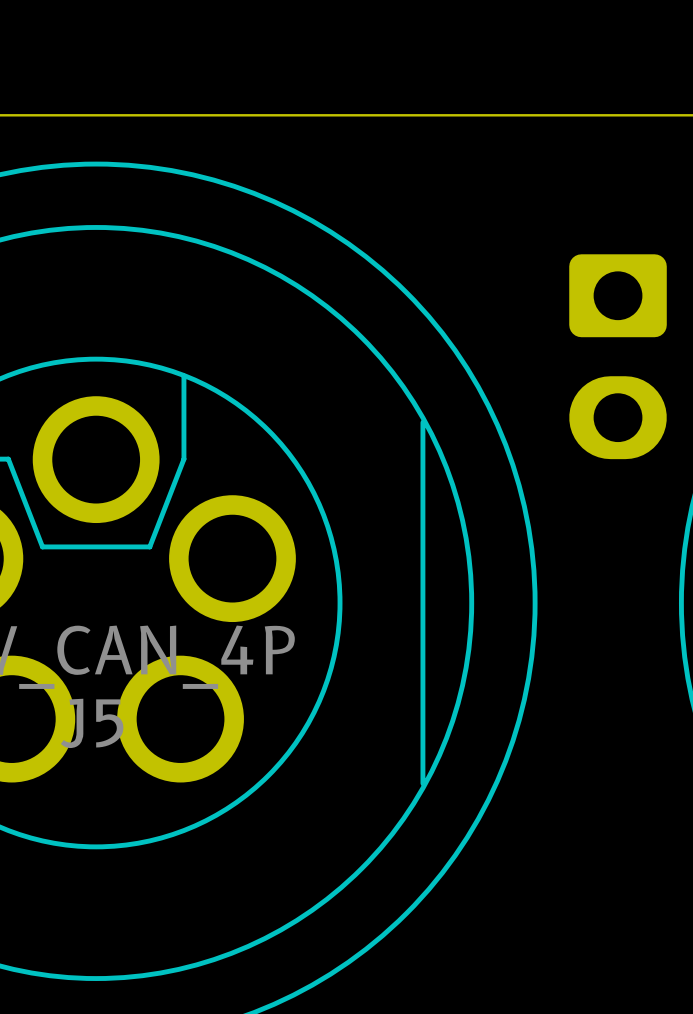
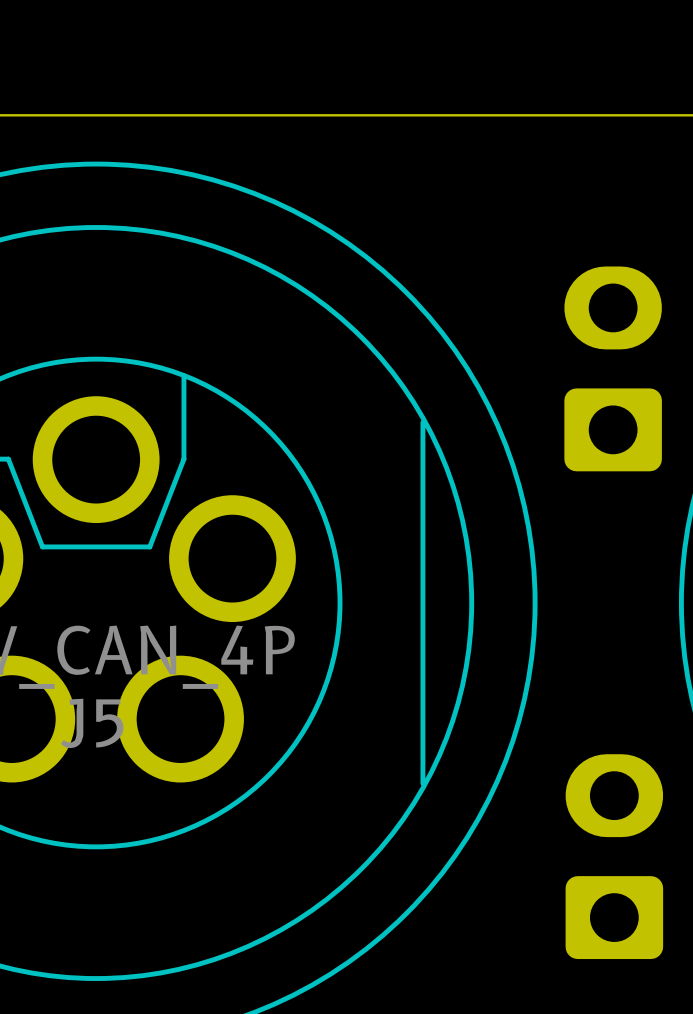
part rotation: 0° (618, 356) -> 180° (613, 368)
part: none -> (614, 856)

